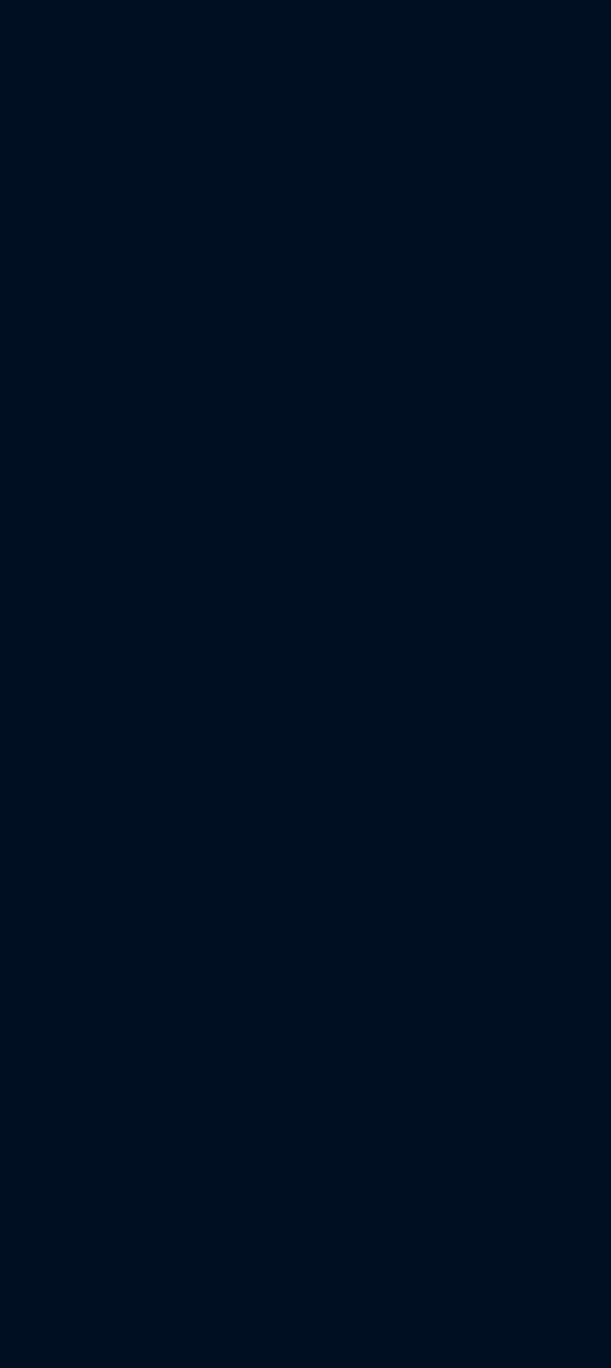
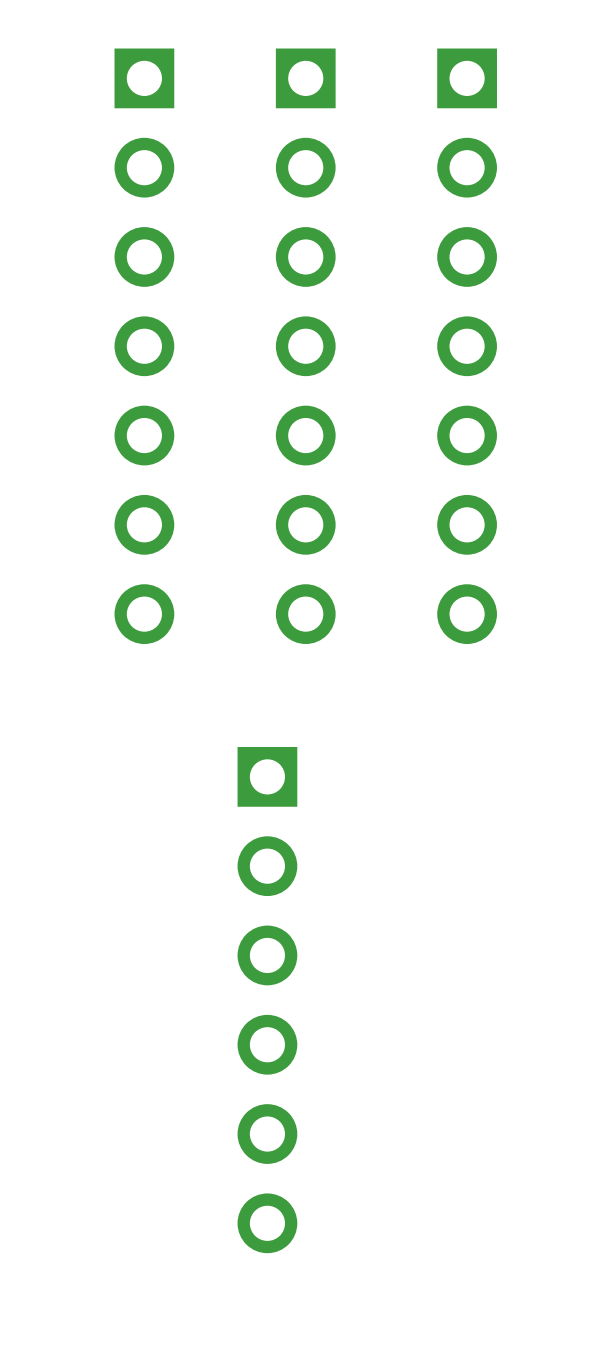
part: none -> (144, 346)
part: none -> (305, 346)
part: none -> (467, 346)
part: none -> (267, 1000)

